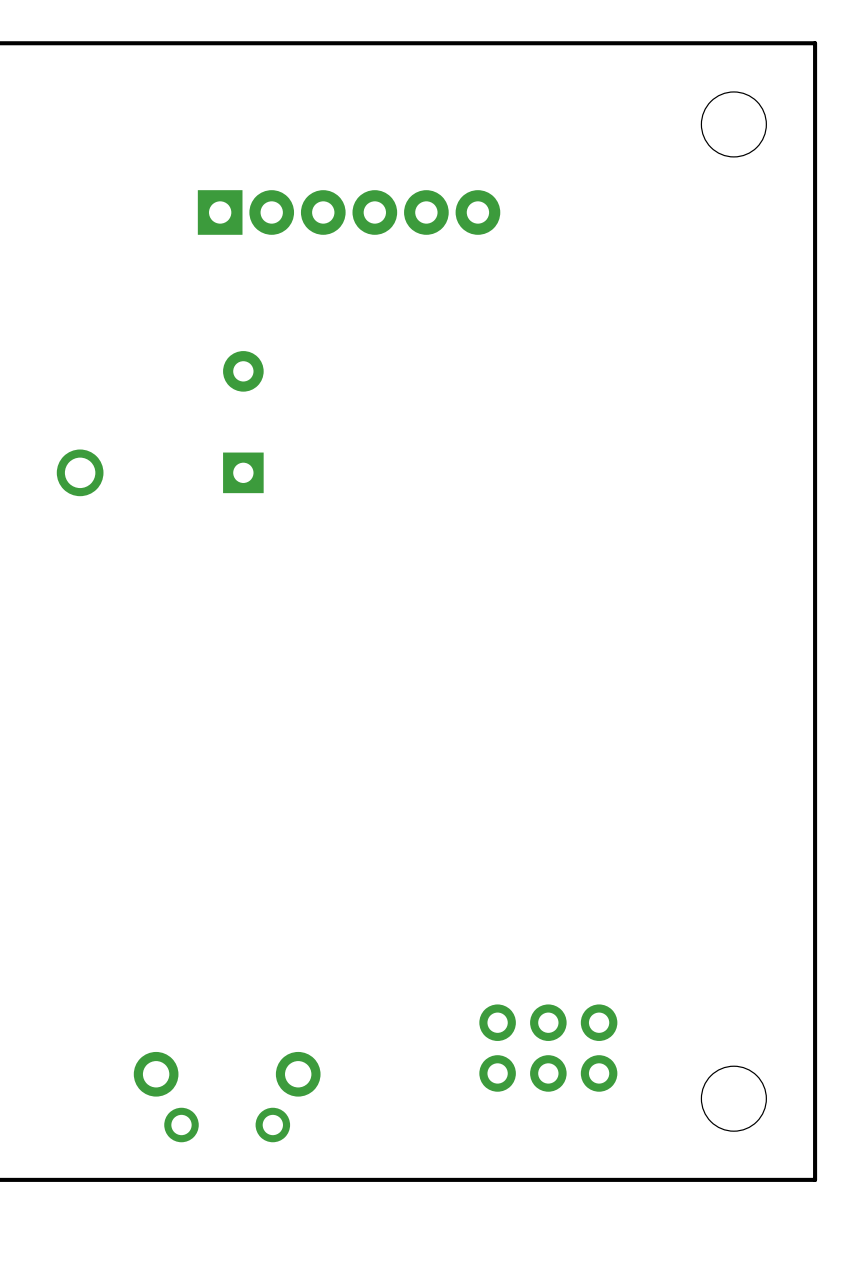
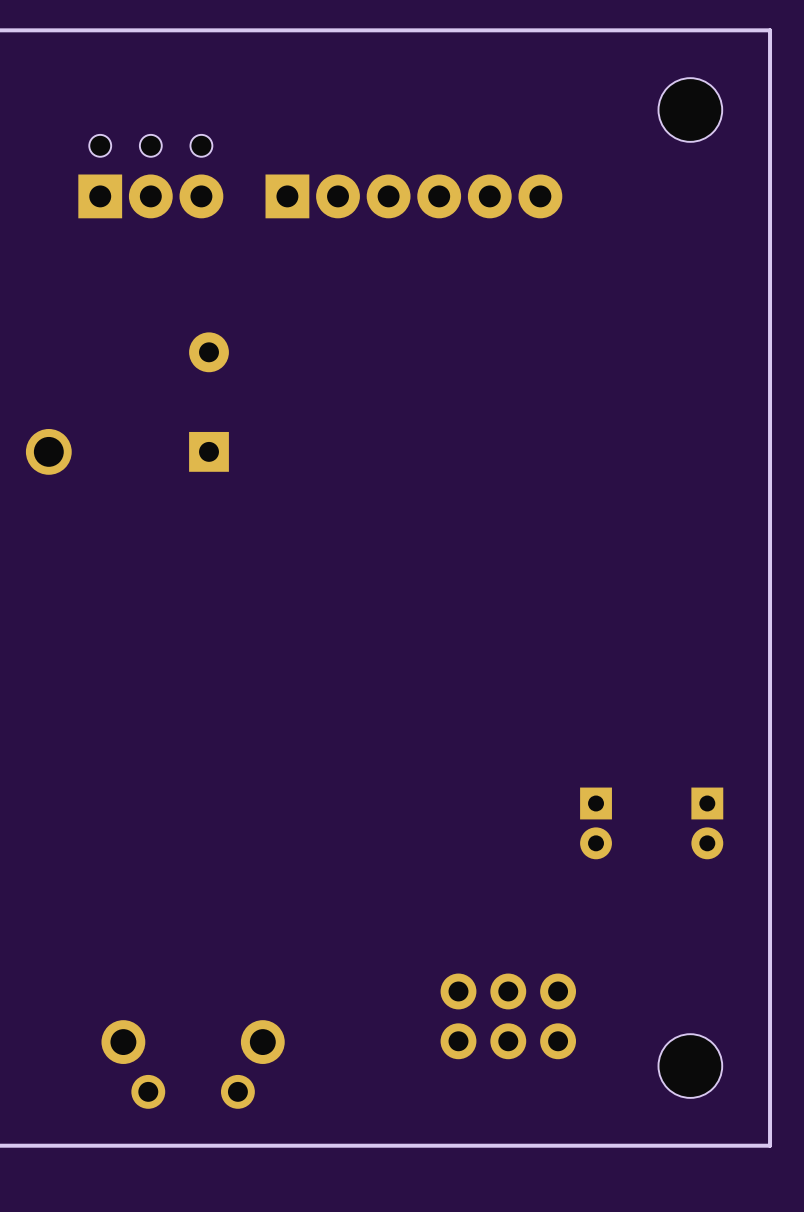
part: none -> (150, 176)
part position: (349, 212) -> (413, 196)
part: none -> (596, 823)
part: none -> (707, 823)

